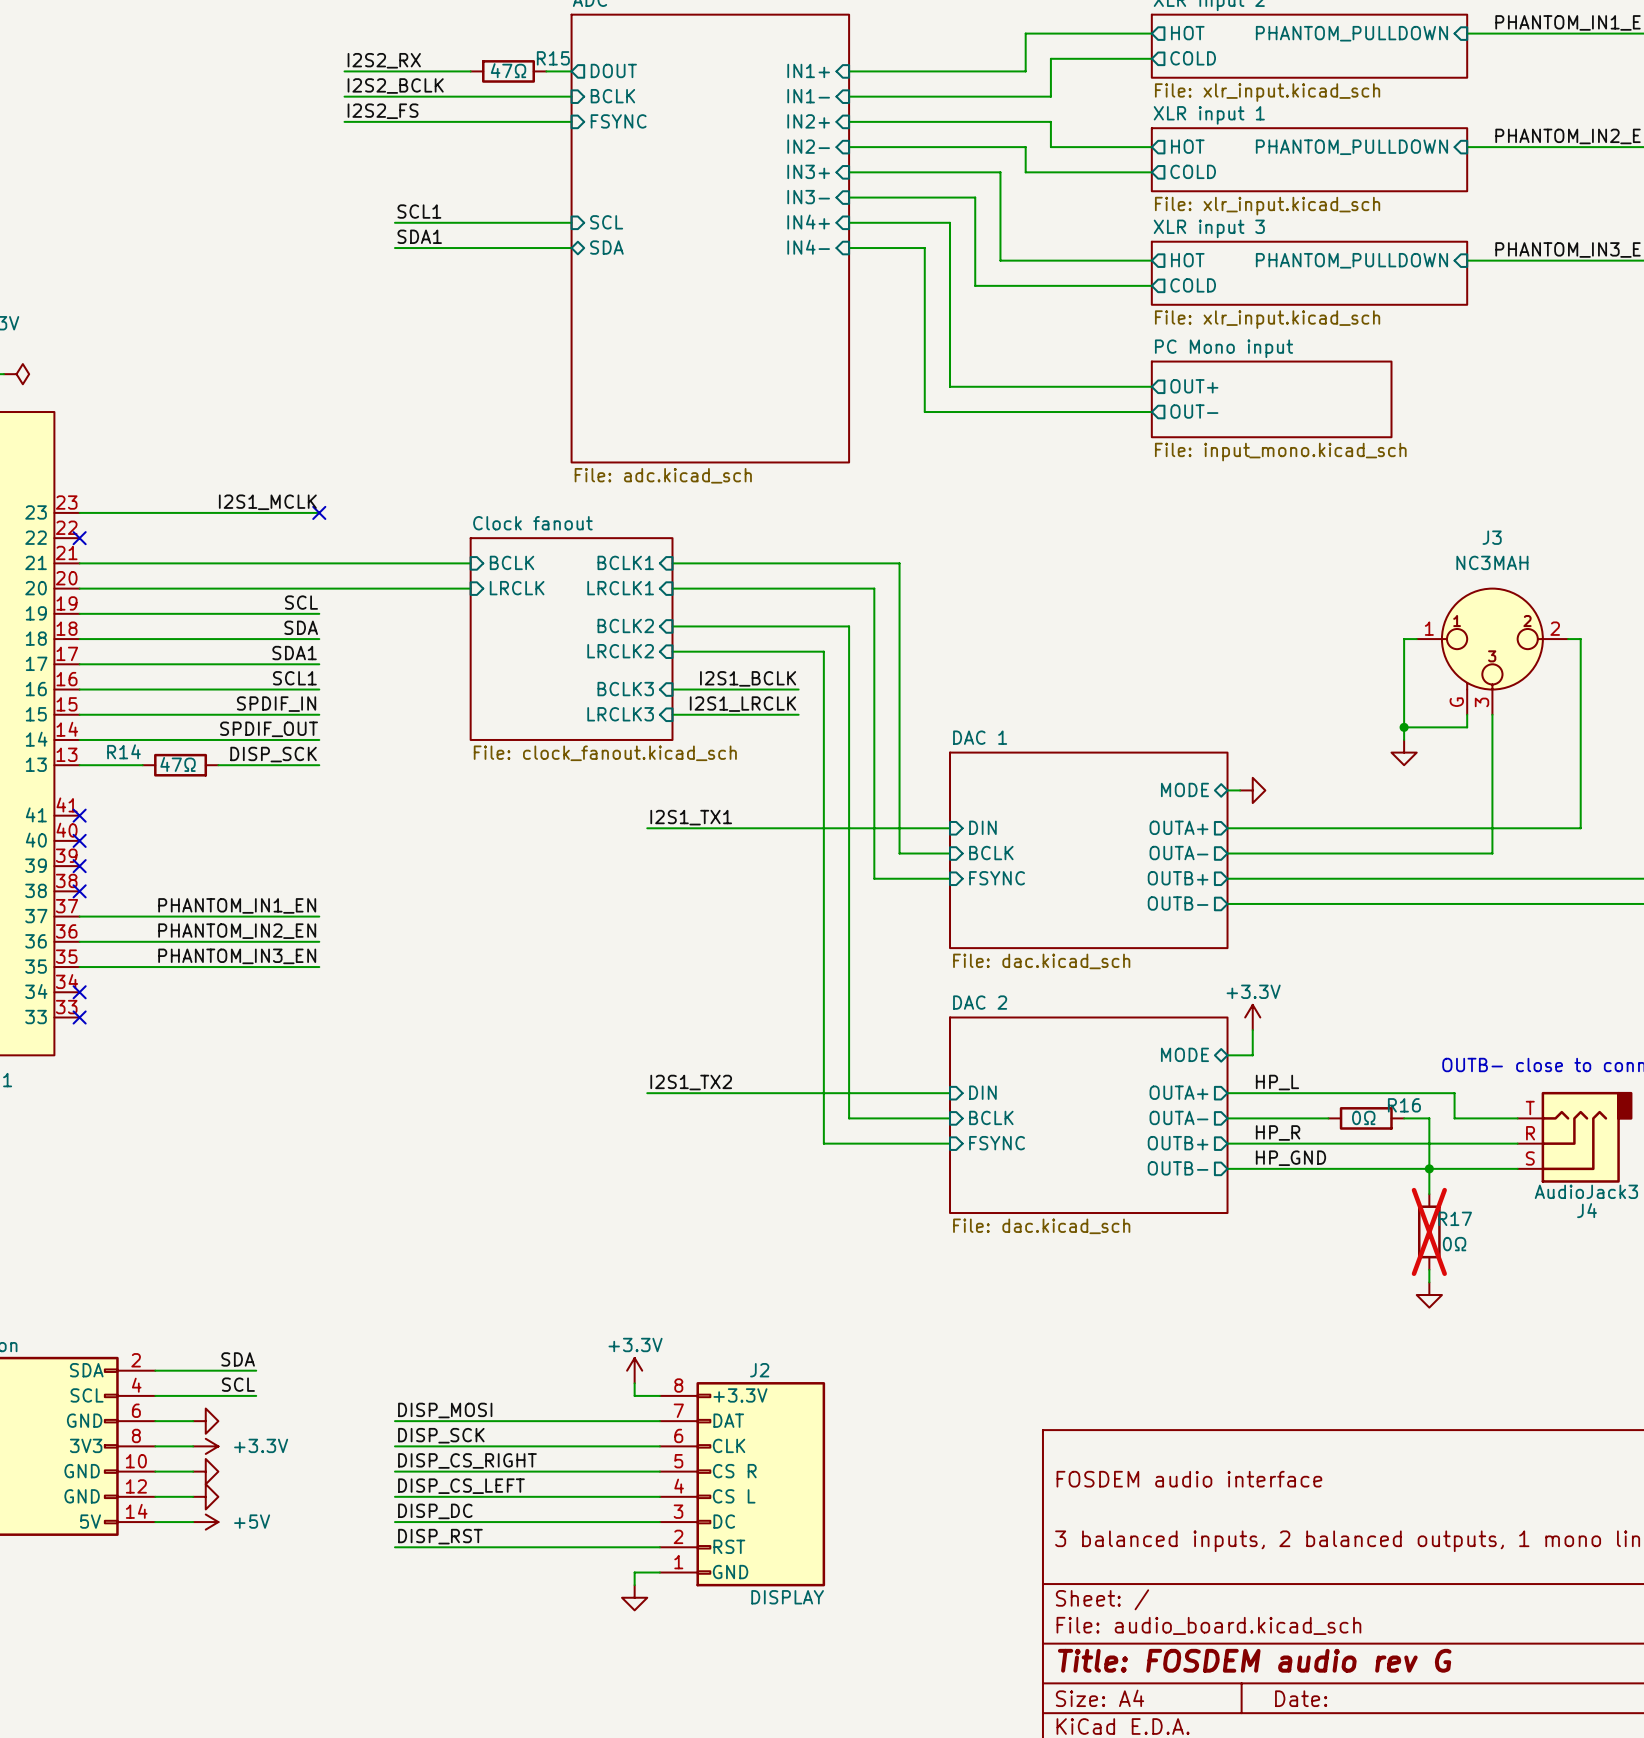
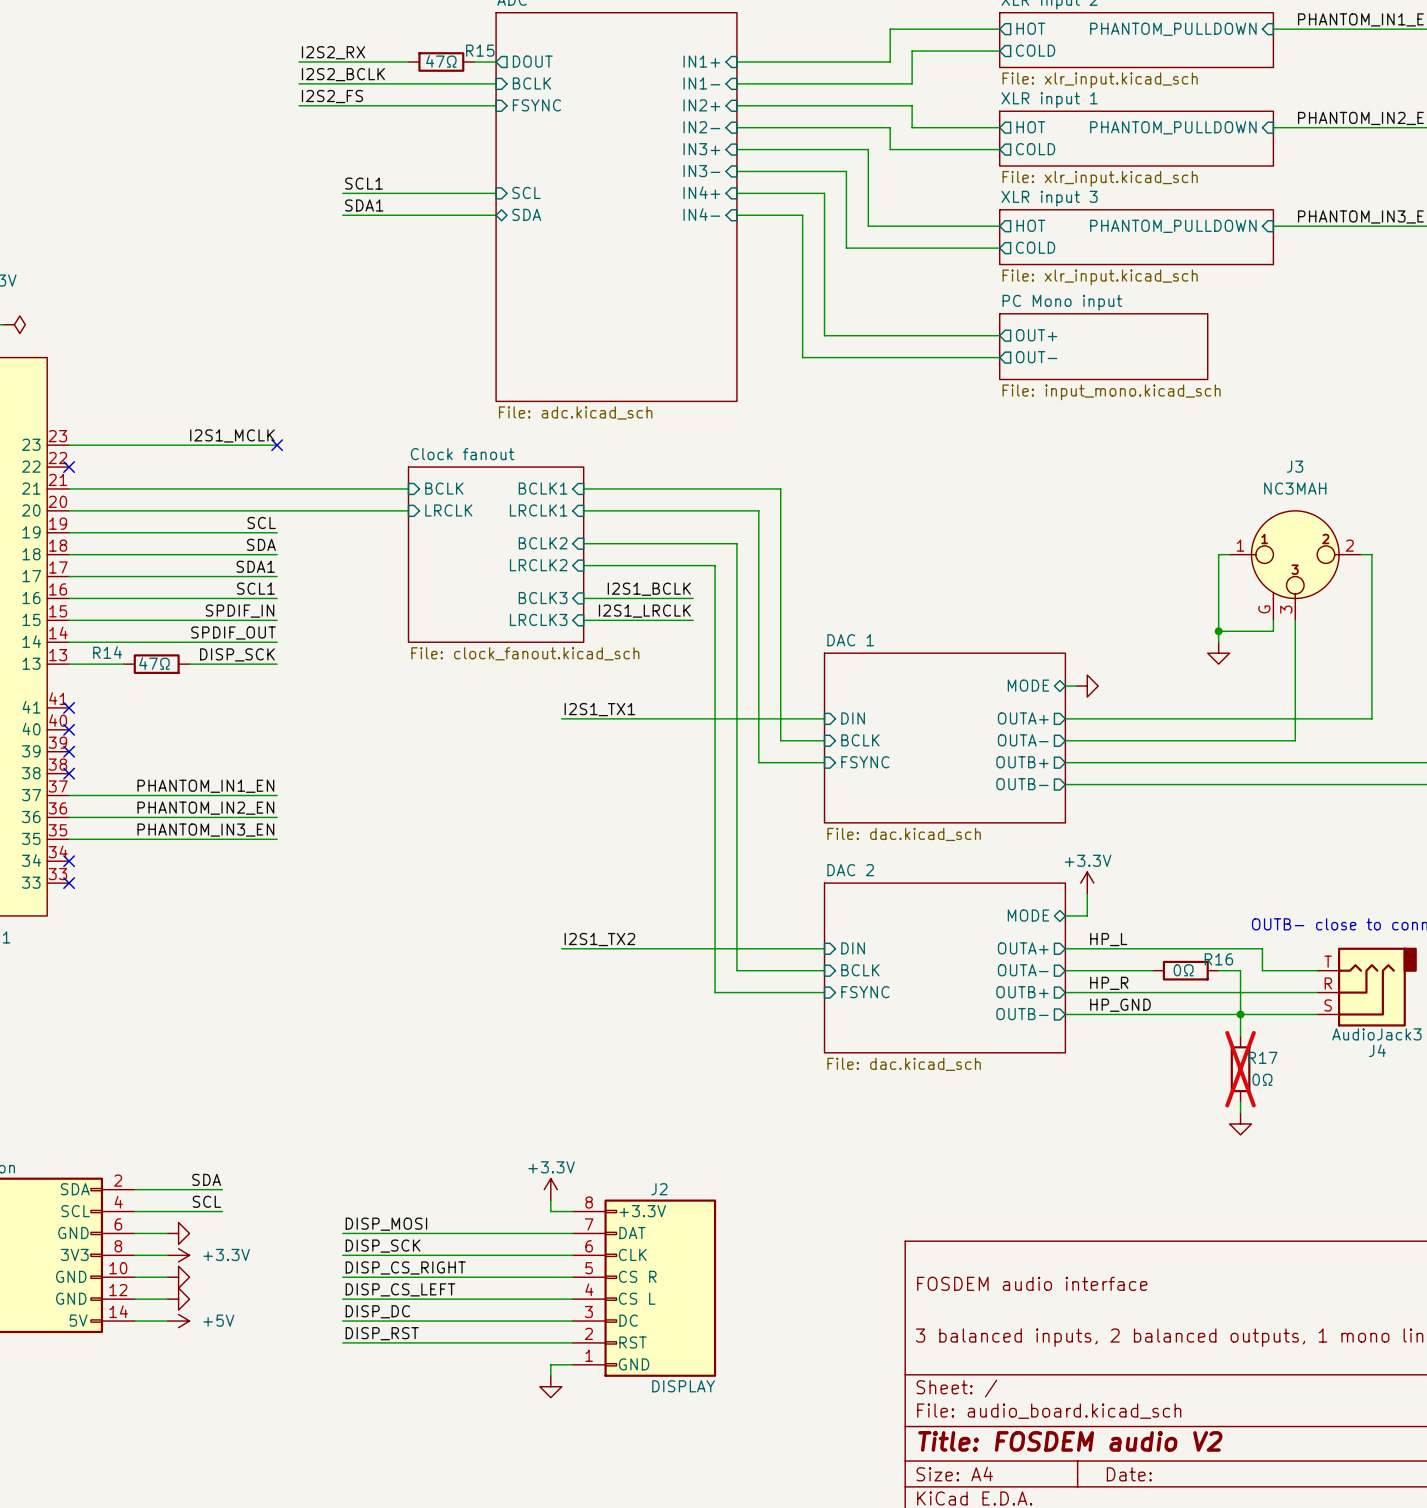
title block: Title: FOSDEM audio rev G (1254, 1660) -> Title: FOSDEM audio V2 (1070, 1441)

